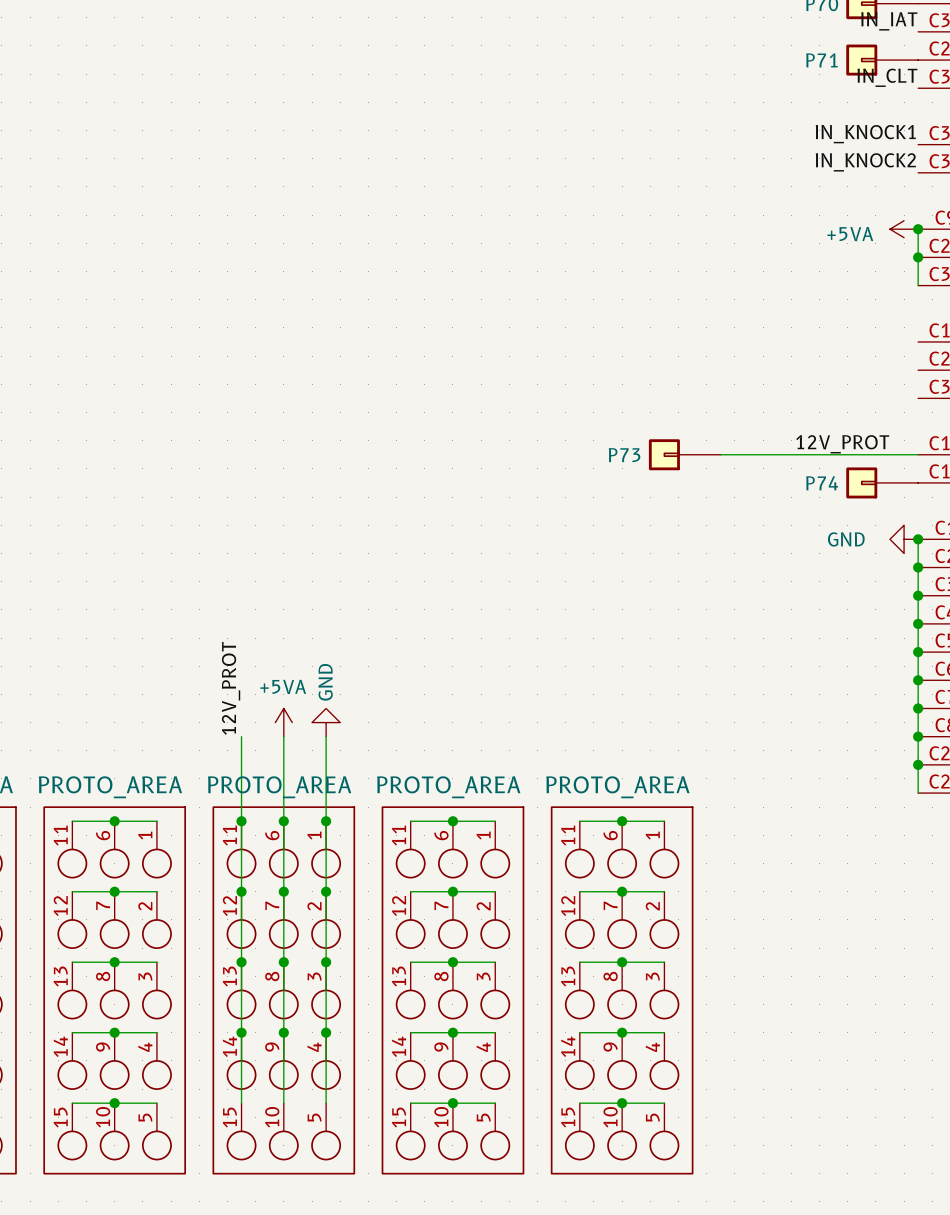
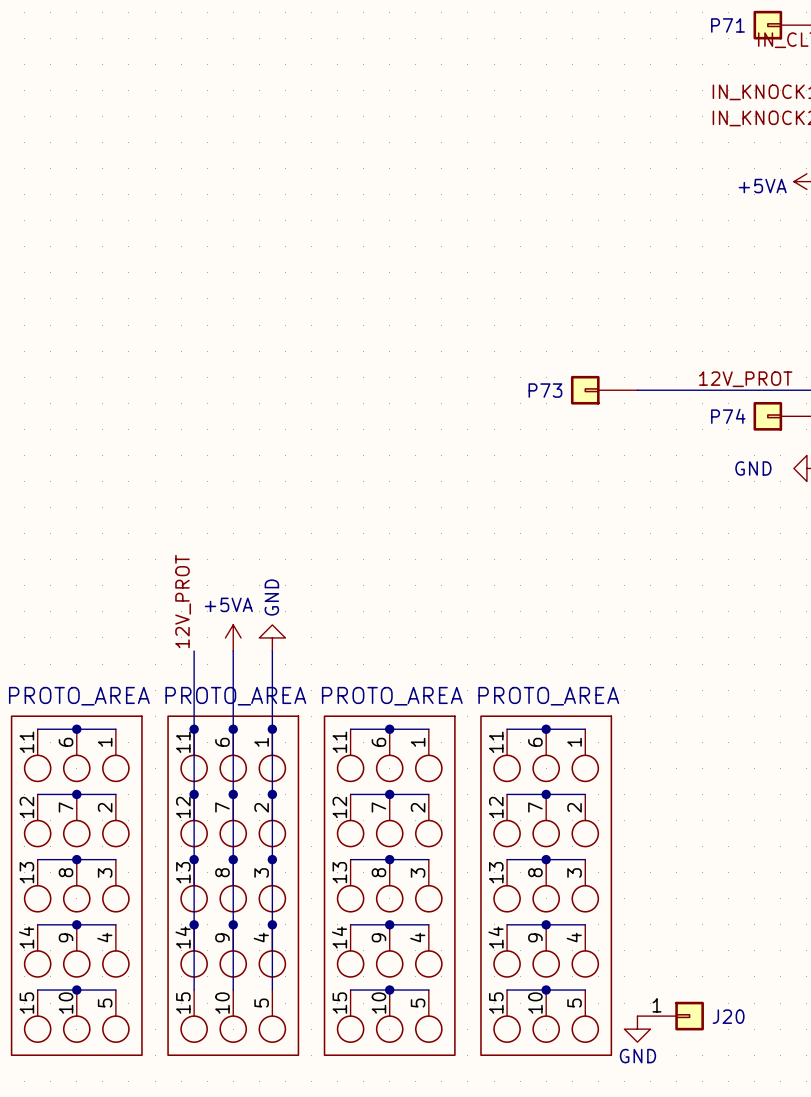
J20: none -> (670, 1016)
power symbol: none -> GND (637, 1029)

